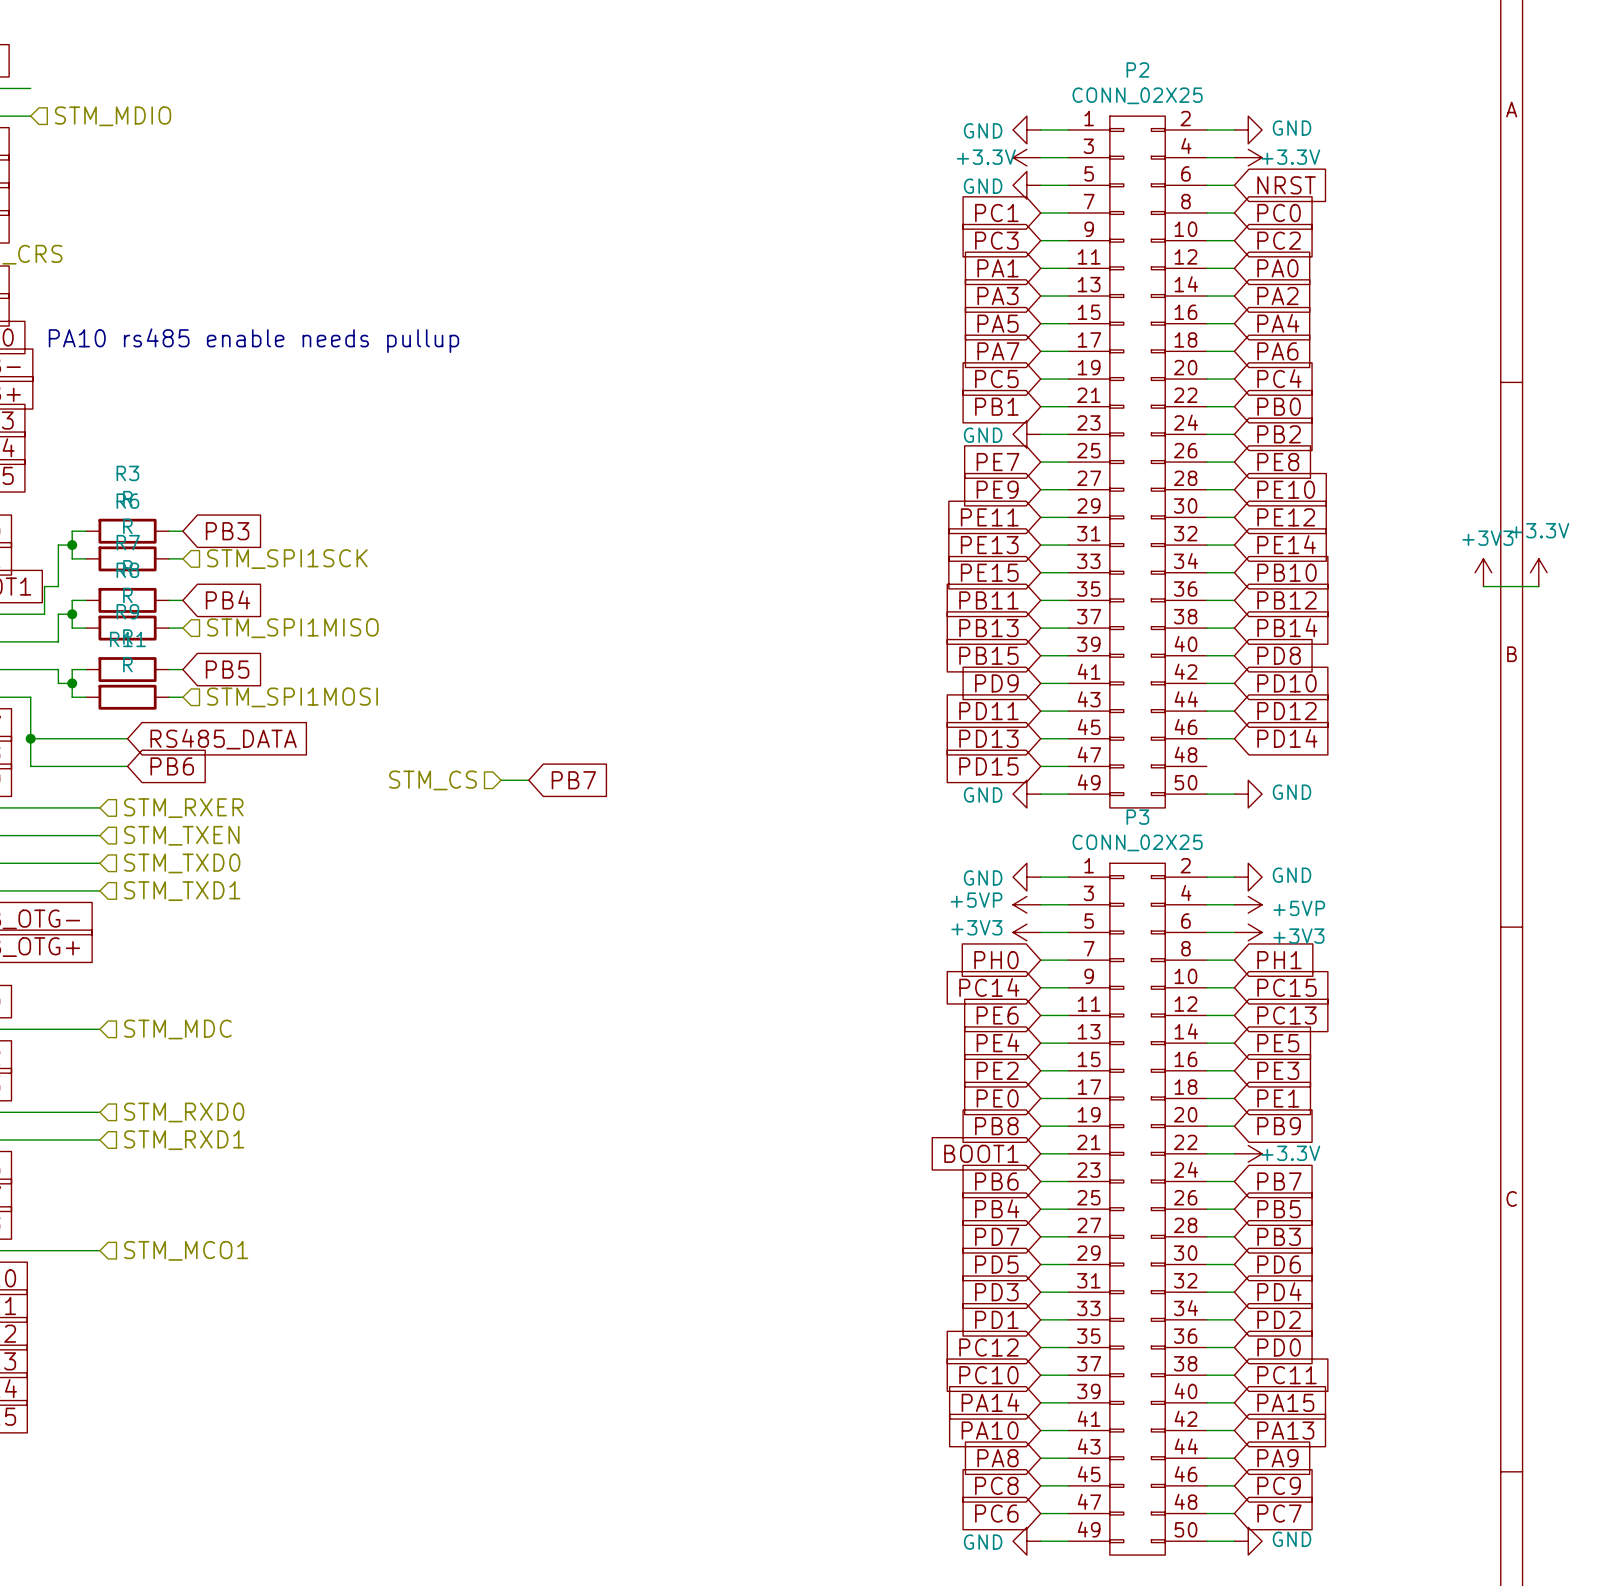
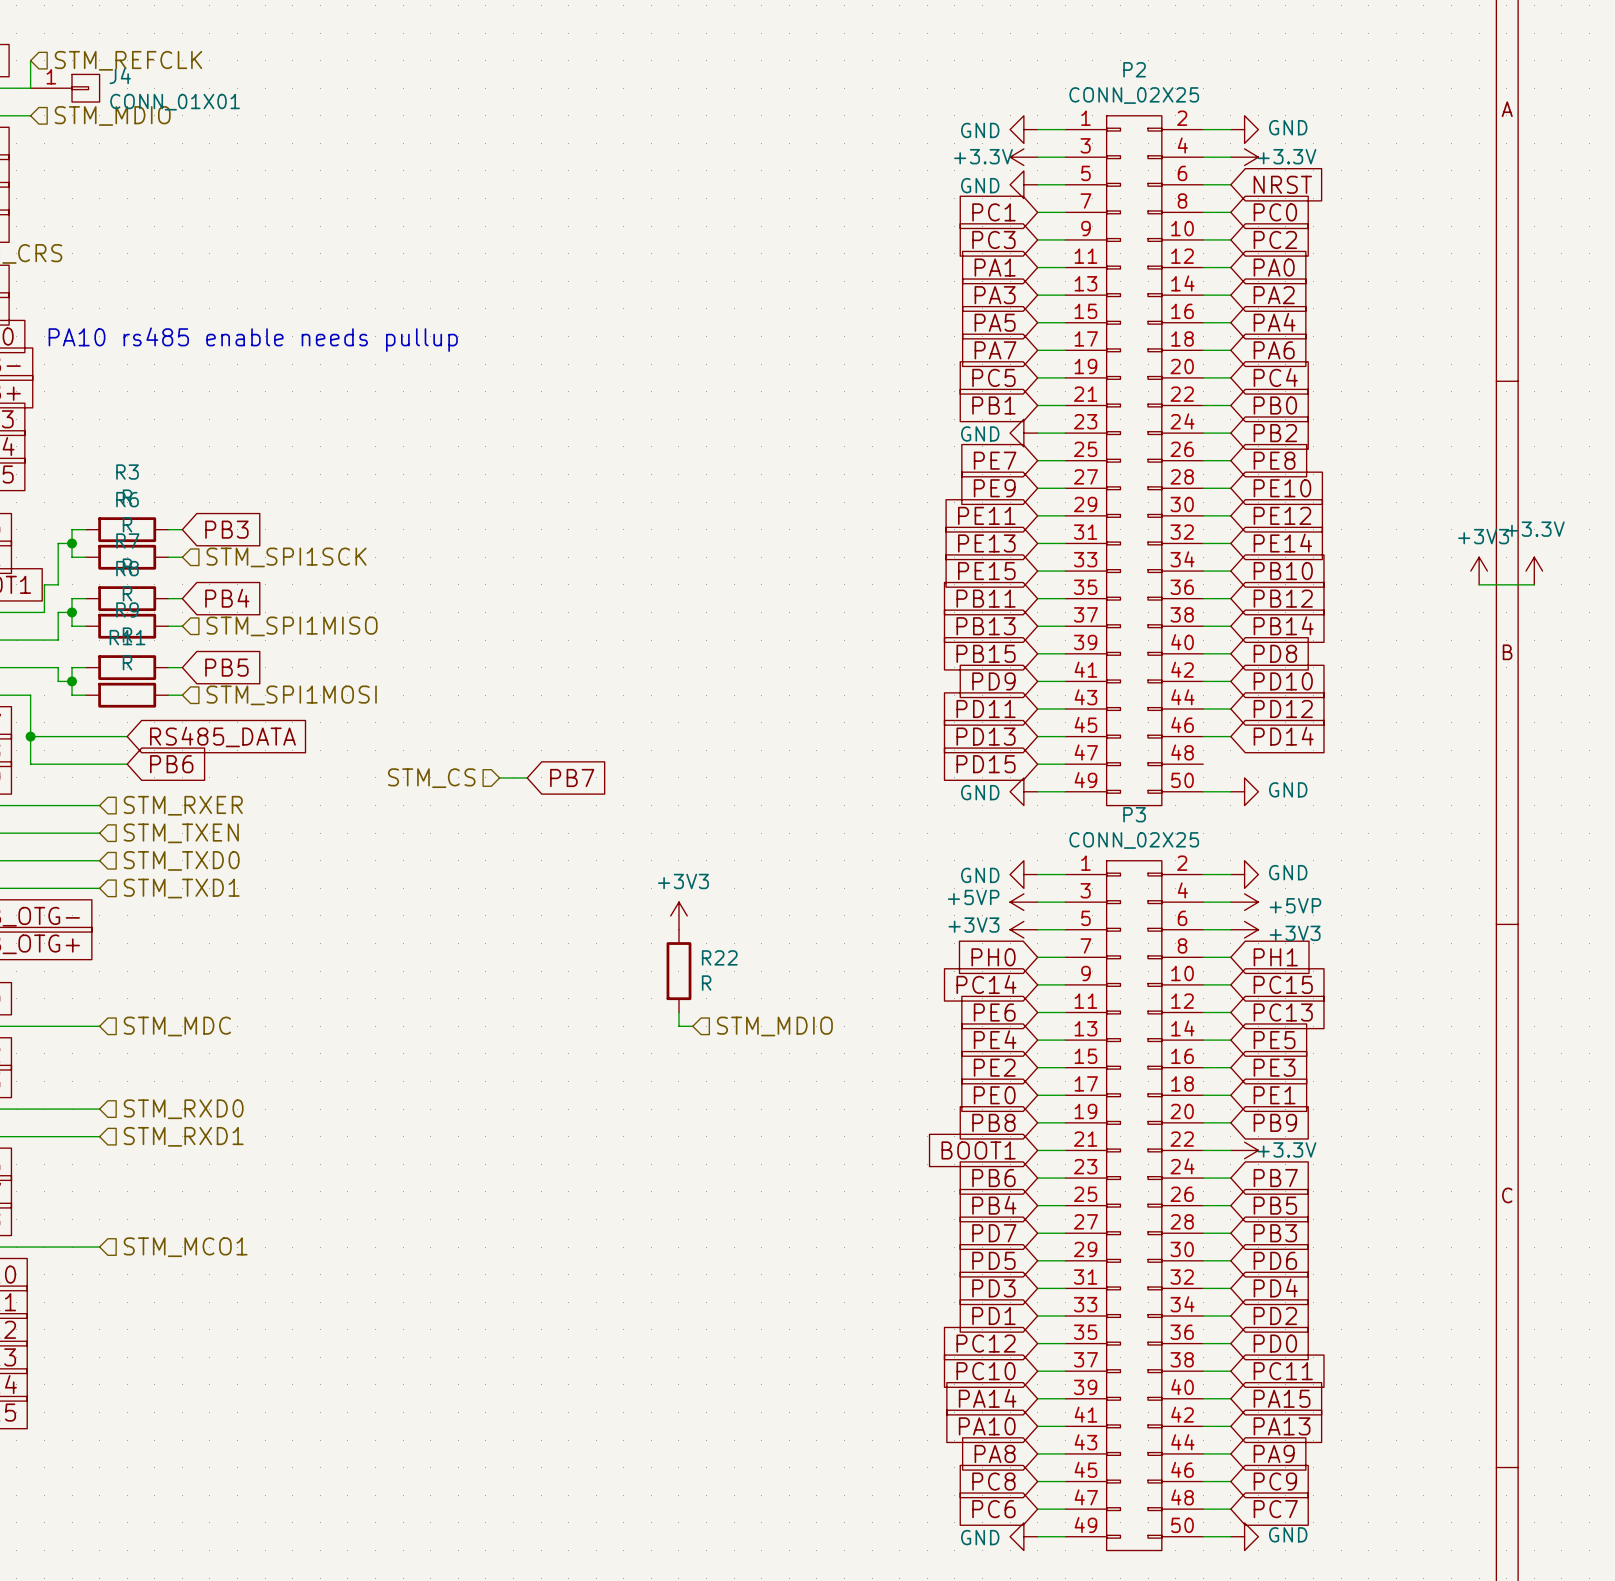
wire: none -> (30, 60) (30, 88)
hierarchical label: none -> STM_REFCLK (128, 60)
J4: none -> CONN_01X01 (65, 88)
power symbol: none -> +3V3 (678, 915)
R22: none -> R (678, 971)
wire: none -> (678, 1012) (678, 1026) (692, 1026)
hierarchical label: none -> STM_MDIO (774, 1026)

